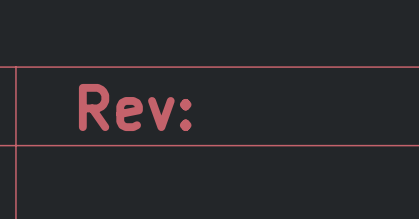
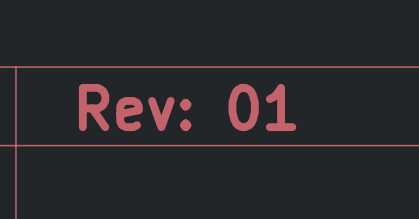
title block: Rev: (135, 107) -> Rev: 01 (187, 107)

